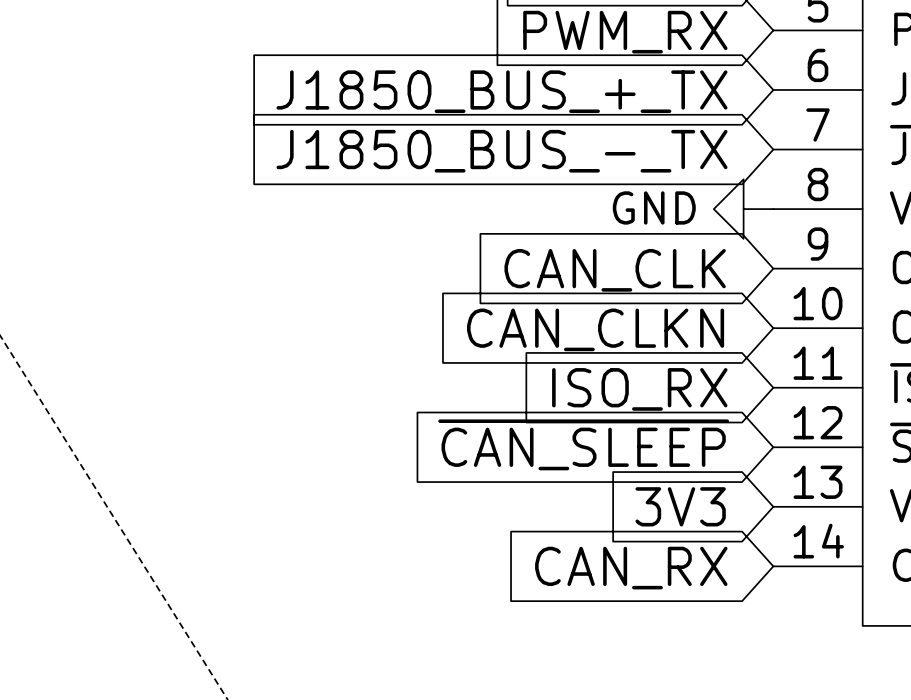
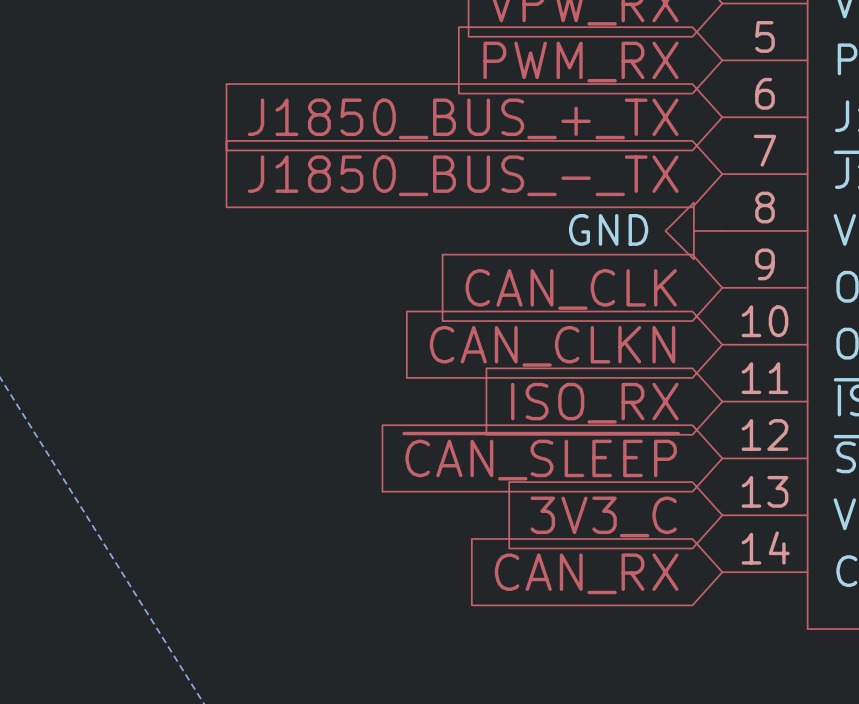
global label: 3V3 (680, 506) -> 3V3_C (603, 516)

